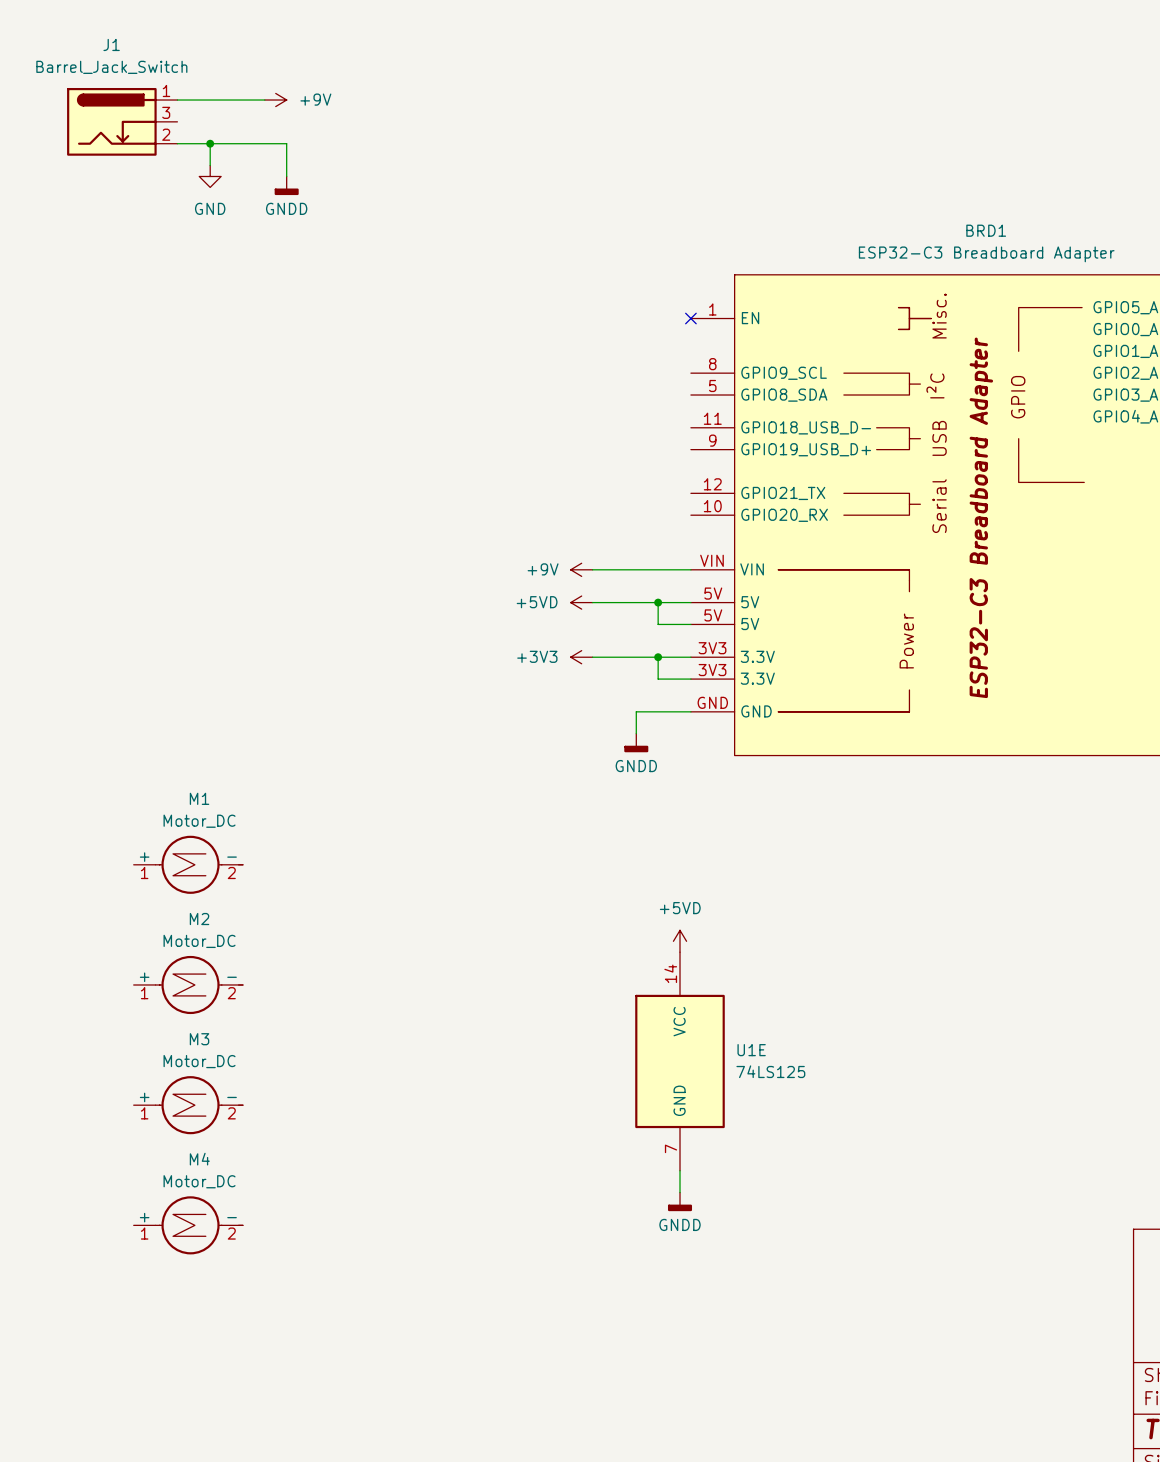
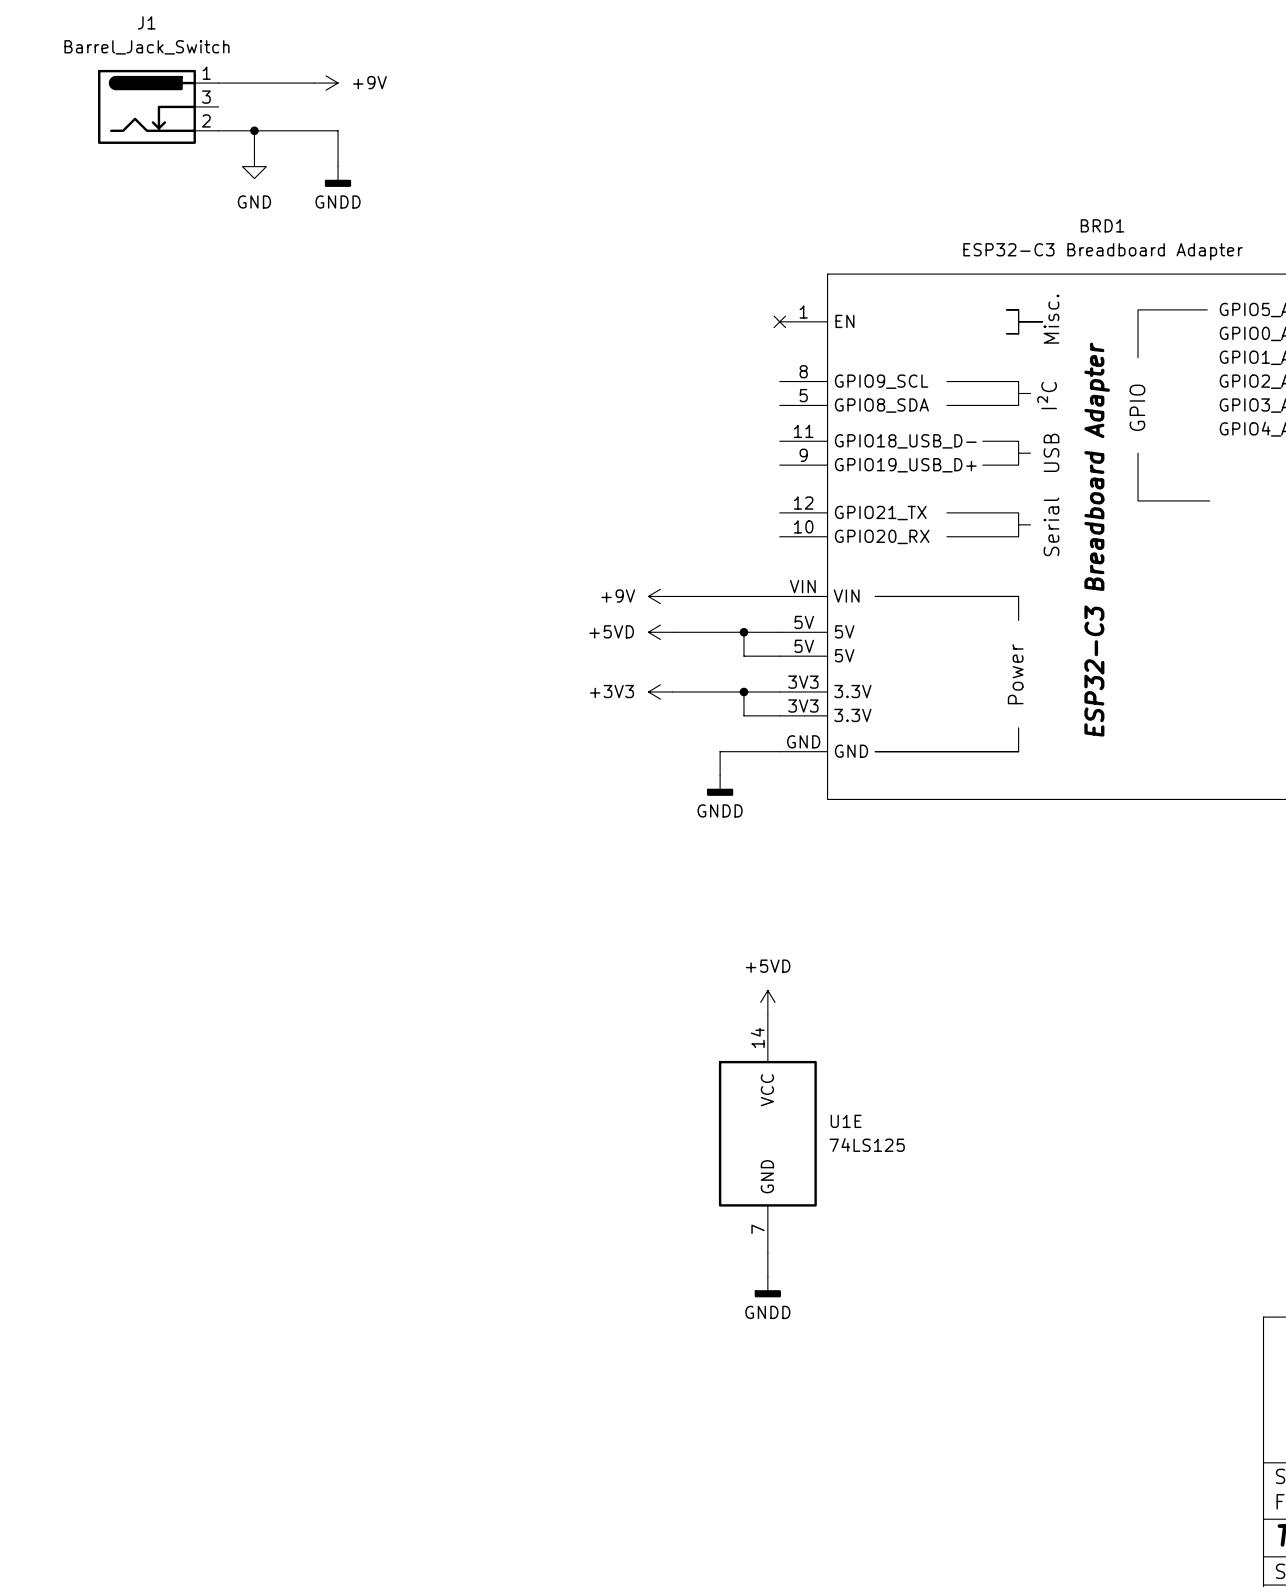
M1: Motor_DC (188, 864) -> none
M2: Motor_DC (188, 984) -> none
M3: Motor_DC (188, 1105) -> none
M4: Motor_DC (188, 1225) -> none

